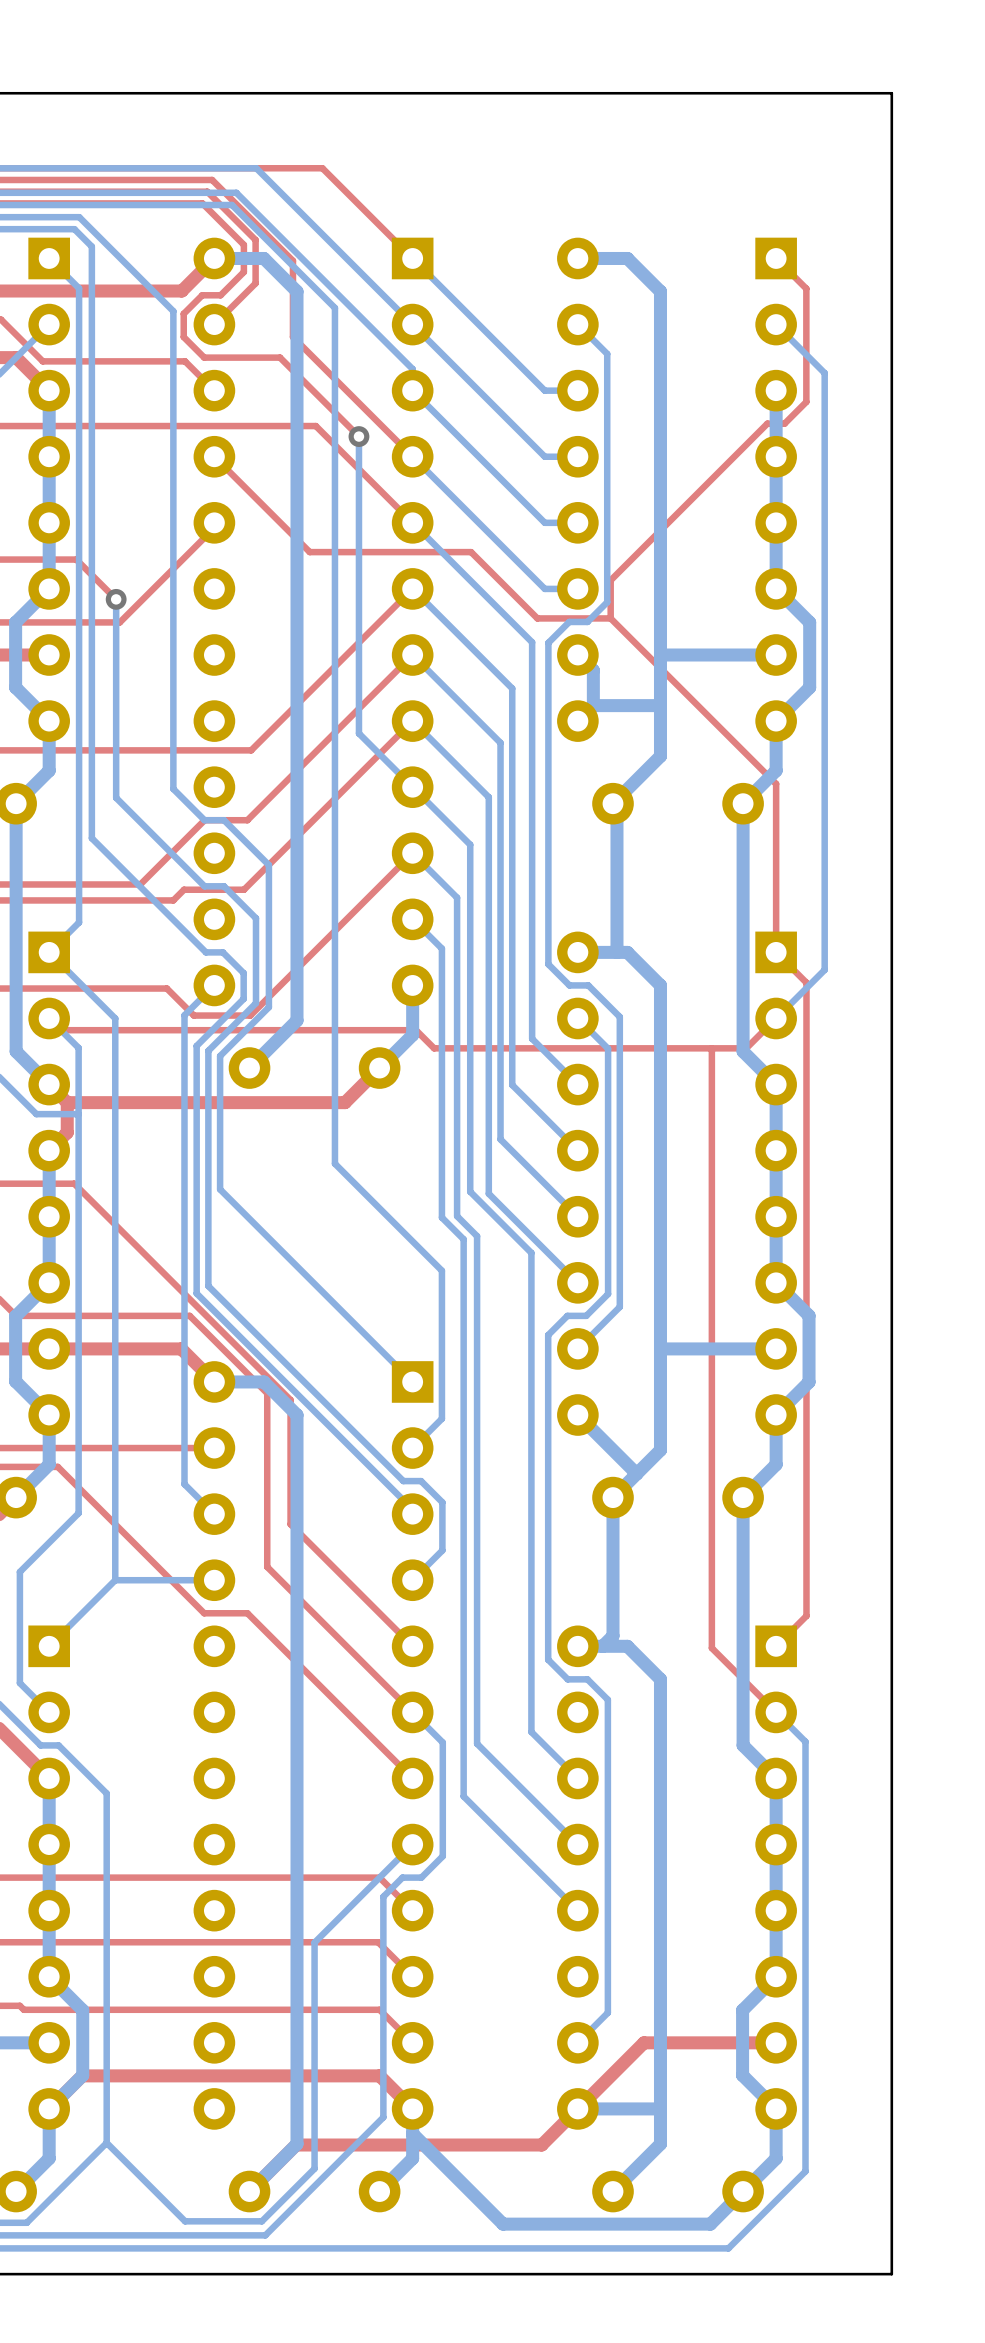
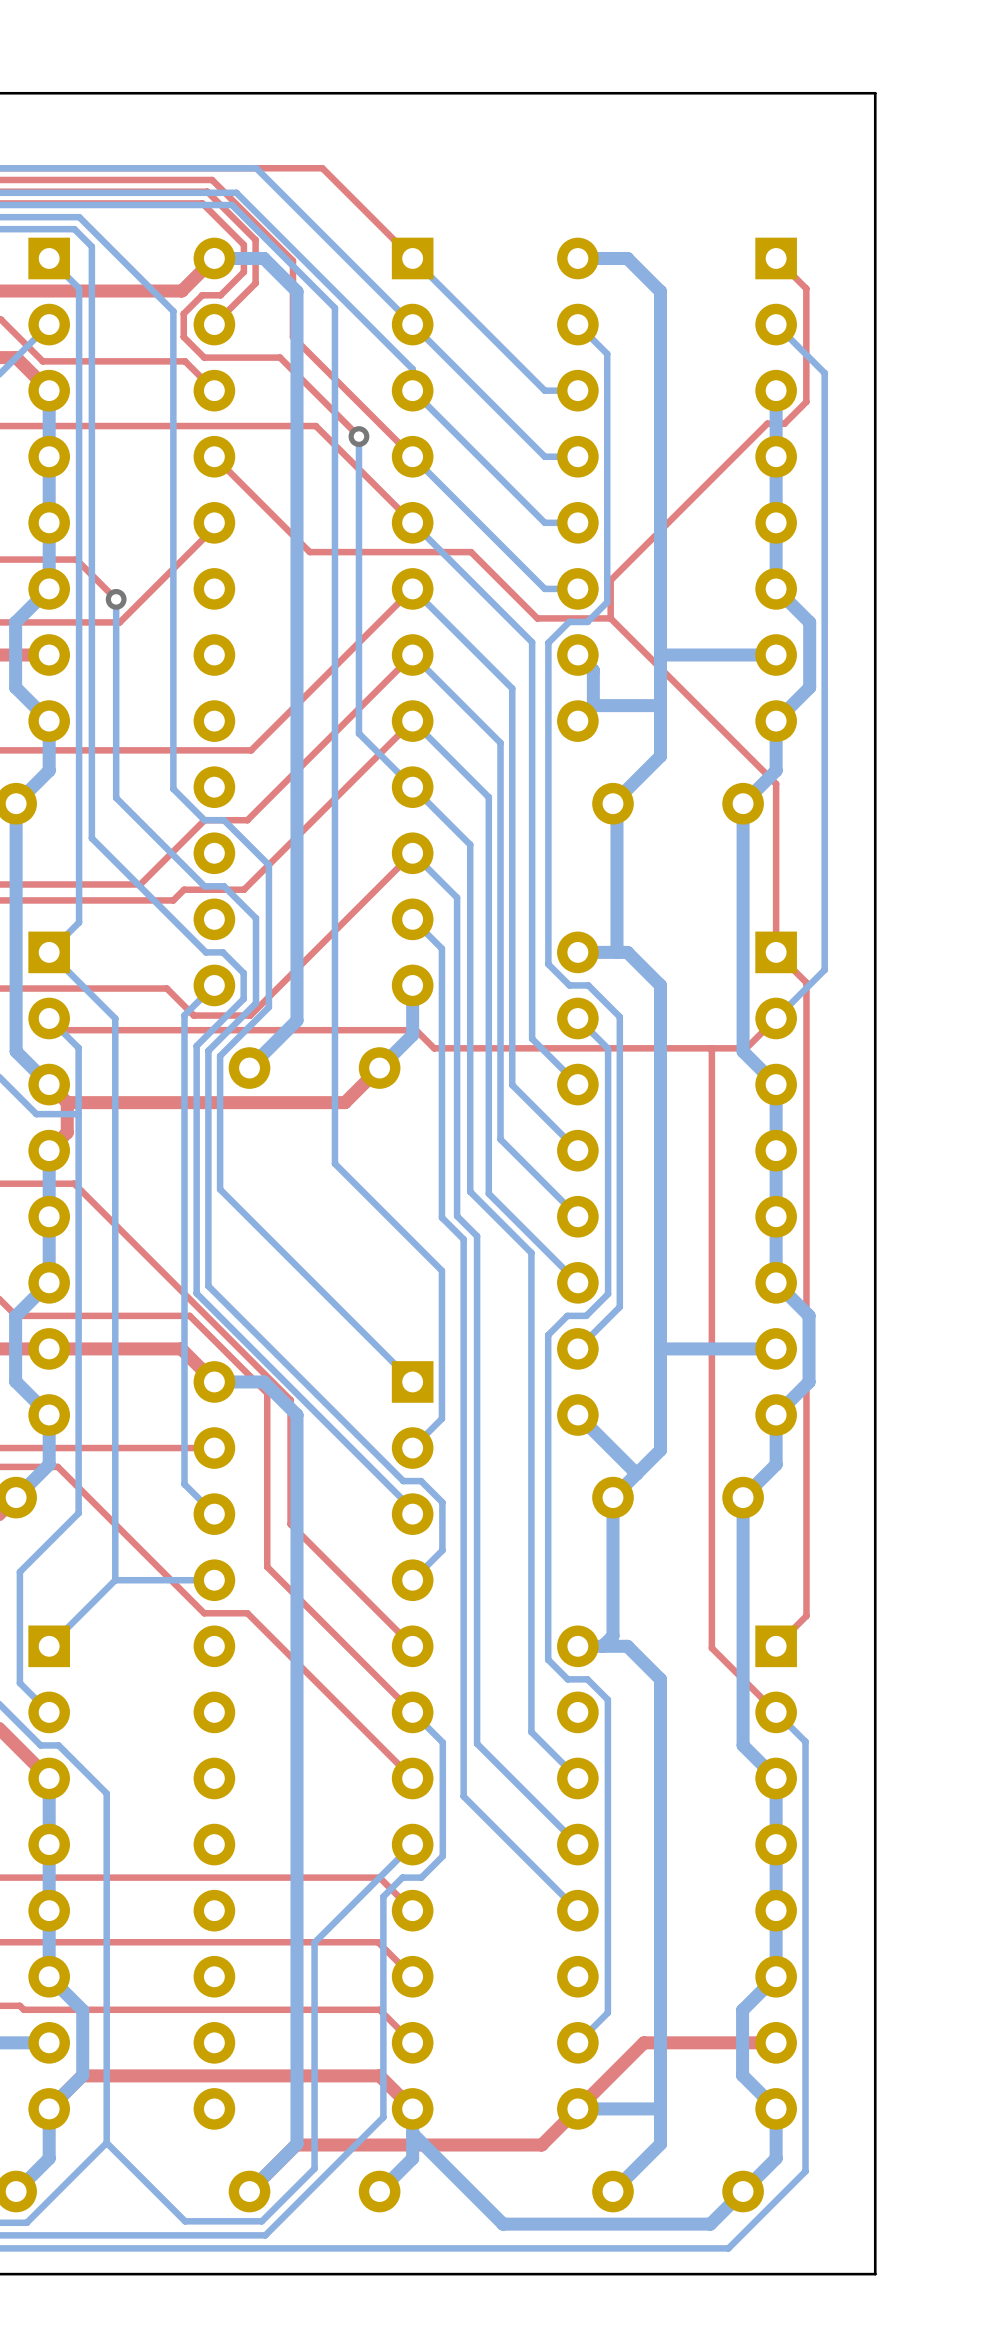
board edge: (875, 93) (891, 93) (891, 2274) (875, 2274) -> (875, 93) (875, 2274)

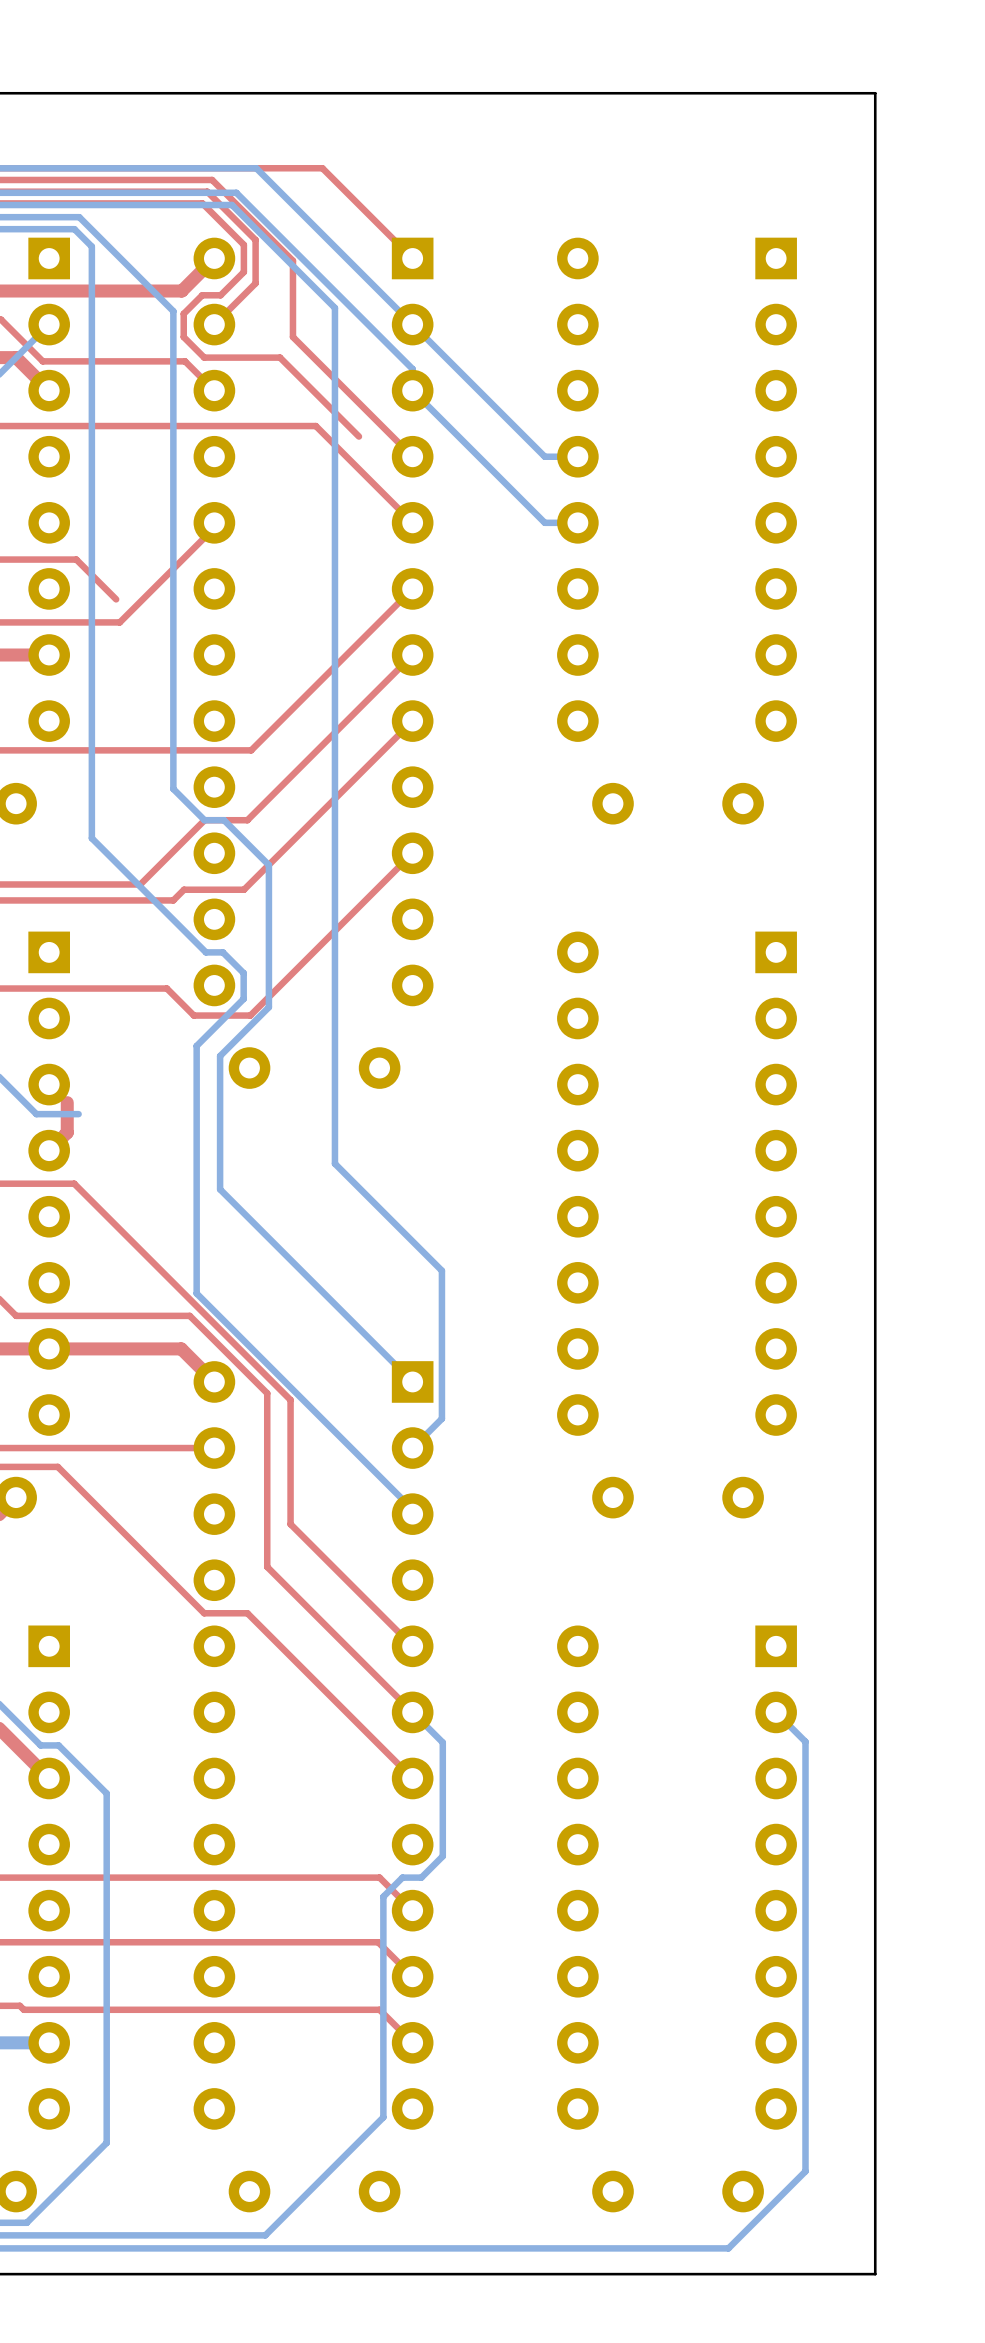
bottom track: (49, 258) (79, 288) (79, 922) (49, 952) (115, 1018) (115, 1580) -> none
bottom track: (214, 258) (263, 258) (297, 291) (297, 1020) (249, 1068) -> none
bottom track: (412, 258) (544, 390) (577, 390) -> none
bottom track: (577, 258) (627, 258) (660, 291) (660, 756) (613, 803) (616, 807) (616, 952) -> none
top track: (776, 258) (806, 288) (806, 401) (784, 423) (767, 423) (610, 580) (610, 618) -> none
bottom track: (577, 324) (607, 353) (607, 602) (587, 621) (569, 621) (548, 642) (548, 964) (569, 985) (588, 985) (619, 1016) (619, 1306) (577, 1348) -> none
bottom track: (776, 324) (824, 373) (824, 969) (776, 1018) -> none
bottom track: (49, 390) (49, 588) (15, 622) (15, 687) (49, 721) (49, 770) (16, 803) (16, 1051) (49, 1084) -> none
bottom track: (776, 390) (776, 588) (809, 622) (809, 687) (776, 721) (776, 770) (743, 803) (743, 1051) (776, 1084) (776, 1282) (809, 1315) (809, 1382) (776, 1415) (776, 1464) (743, 1497) (743, 1745) (776, 1778) (776, 1976) (742, 2010) (742, 2075) (776, 2108) (776, 2158) (710, 2224) (503, 2224) (412, 2133) -> none
bottom track: (358, 436) (358, 733) (470, 844) (470, 1191) (531, 1252) (531, 1732) (577, 1778) -> none
via: (358, 436) -> none
top track: (214, 456) (309, 552) (471, 552) (537, 618) (610, 618) -> none
bottom track: (412, 456) (544, 588) (577, 588) -> none
bottom track: (412, 522) (532, 642) (532, 1038) (577, 1084) -> none
bottom track: (412, 588) (512, 688) (512, 1085) (577, 1150) -> none
bottom track: (116, 599) (116, 797) (204, 886) (224, 886) (255, 918) (255, 1003) (208, 1050) (208, 1286) (403, 1481) (421, 1481) (442, 1502) (442, 1550) (412, 1580) -> none
via: (116, 599) -> none
top track: (610, 618) (776, 783) (776, 952) (806, 982) (806, 1615) (776, 1646) -> none
bottom track: (412, 655) (500, 742) (500, 1139) (577, 1216) -> none
bottom track: (577, 655) (593, 670) (593, 705) -> none
bottom track: (776, 655) (660, 655) -> none
bottom track: (660, 705) (593, 705) -> none
bottom track: (412, 721) (488, 797) (488, 1193) (577, 1282) -> none
bottom track: (412, 853) (457, 897) (457, 1216) (477, 1236) (477, 1743) (577, 1844) -> none
bottom track: (412, 919) (441, 948) (441, 1217) (463, 1239) (463, 1796) (577, 1910) -> none
bottom track: (577, 952) (627, 952) (660, 985) (660, 1450) (613, 1497) (613, 1635) (602, 1646) -> none
bottom track: (214, 985) (184, 1015) (184, 1484) (214, 1514) -> none
bottom track: (412, 985) (412, 1035) (379, 1068) -> none
bottom track: (49, 1018) (78, 1047) (78, 1513) (19, 1571) (19, 1683) (49, 1712) -> none
bottom track: (577, 1018) (608, 1048) (608, 1294) (586, 1315) (567, 1315) (548, 1335) (548, 1659) (567, 1679) (587, 1679) (607, 1699) (607, 2012) (577, 2042) -> none
top track: (776, 1018) (746, 1048) (434, 1048) (416, 1030) (60, 1030) (49, 1018) -> none
top track: (711, 1048) (711, 1648) (776, 1712) -> none
top track: (379, 1068) (345, 1102) (67, 1102) (49, 1084) -> none
bottom track: (49, 1150) (49, 1282) (15, 1316) (15, 1381) (49, 1415) (49, 1464) (16, 1497) -> none
bottom track: (776, 1348) (660, 1348) -> none
bottom track: (214, 1381) (263, 1381) (297, 1415) (297, 2144) (249, 2191) -> none
bottom track: (577, 1415) (636, 1473) -> none
bottom track: (115, 1580) (49, 1646) -> none
bottom track: (214, 1580) (115, 1580) -> none
bottom track: (577, 1646) (627, 1646) (660, 1679) (660, 2144) (613, 2191) -> none
bottom track: (49, 1778) (49, 1976) (82, 2010) (82, 2075) (49, 2108) (49, 2158) (16, 2191) -> none
bottom track: (412, 1844) (314, 1942) (314, 2168) (261, 2221) (185, 2221) (106, 2142) -> none
top track: (776, 2042) (643, 2042) (541, 2145) (296, 2145) (249, 2191) -> none
top track: (412, 2108) (379, 2075) (82, 2075) (49, 2108) -> none
bottom track: (412, 2108) (412, 2158) (379, 2191) -> none
bottom track: (660, 2108) (577, 2108) -> none

